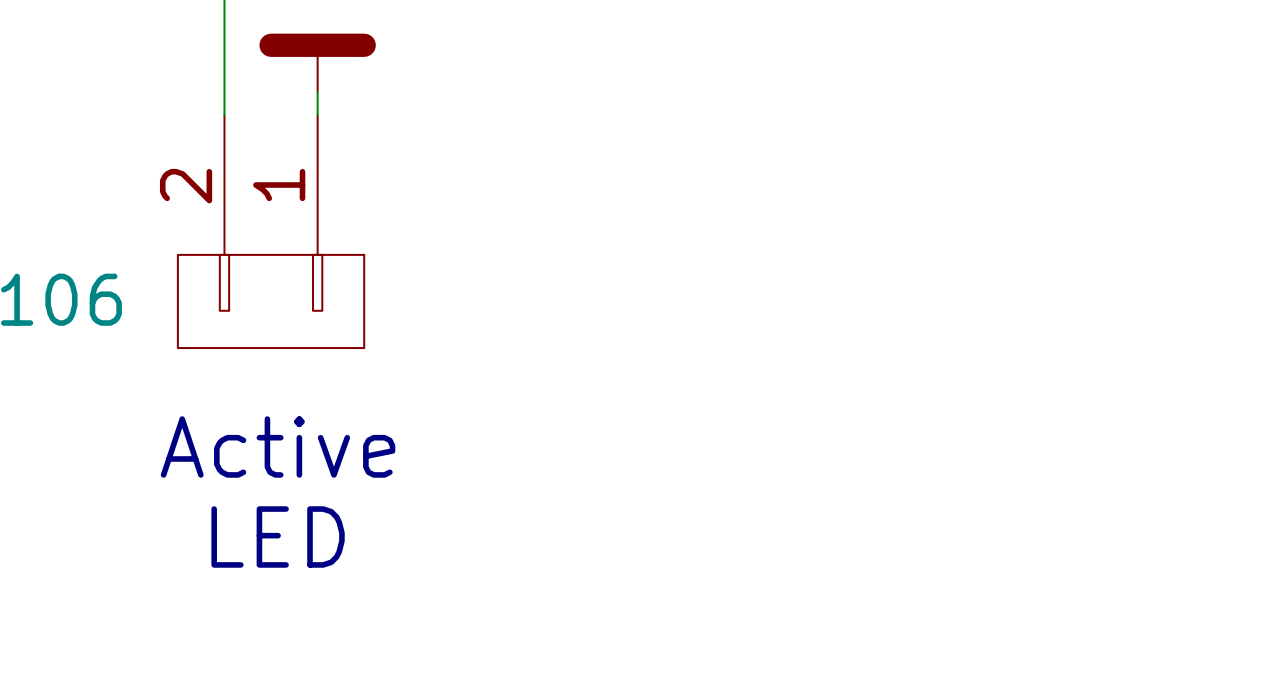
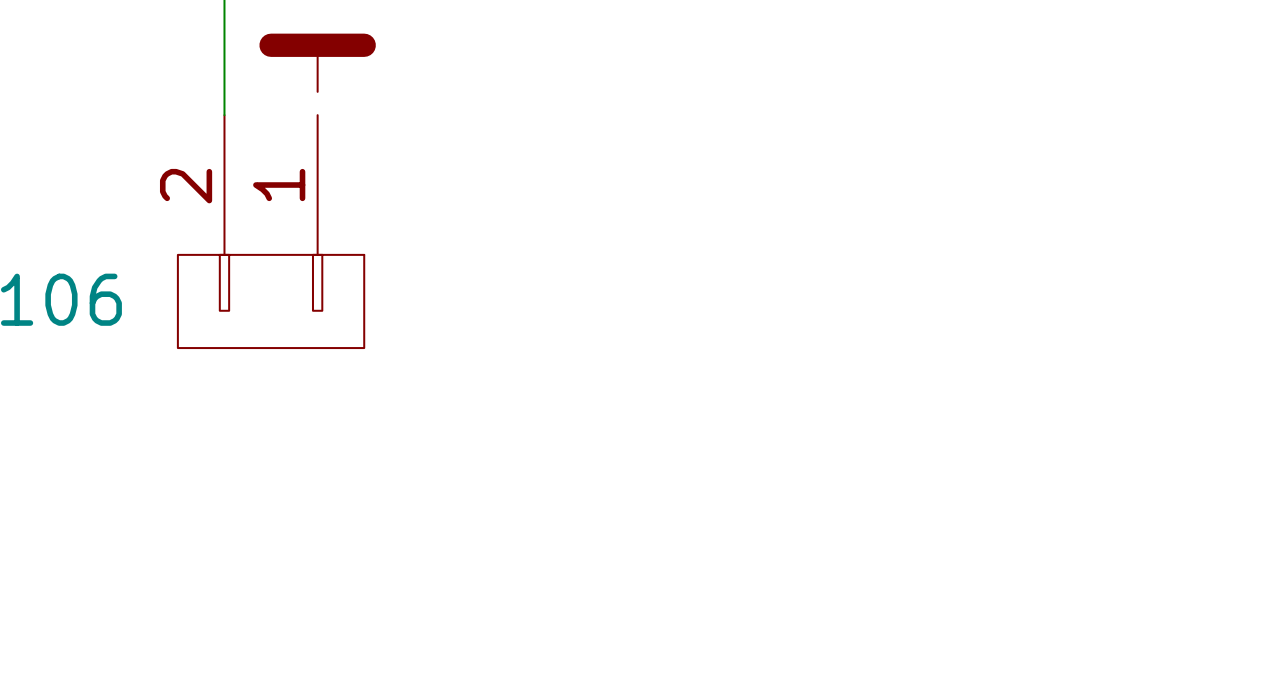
wire: (317, 91) (317, 115) -> none
text: Active (278, 447) -> none
text: LED (278, 536) -> none

